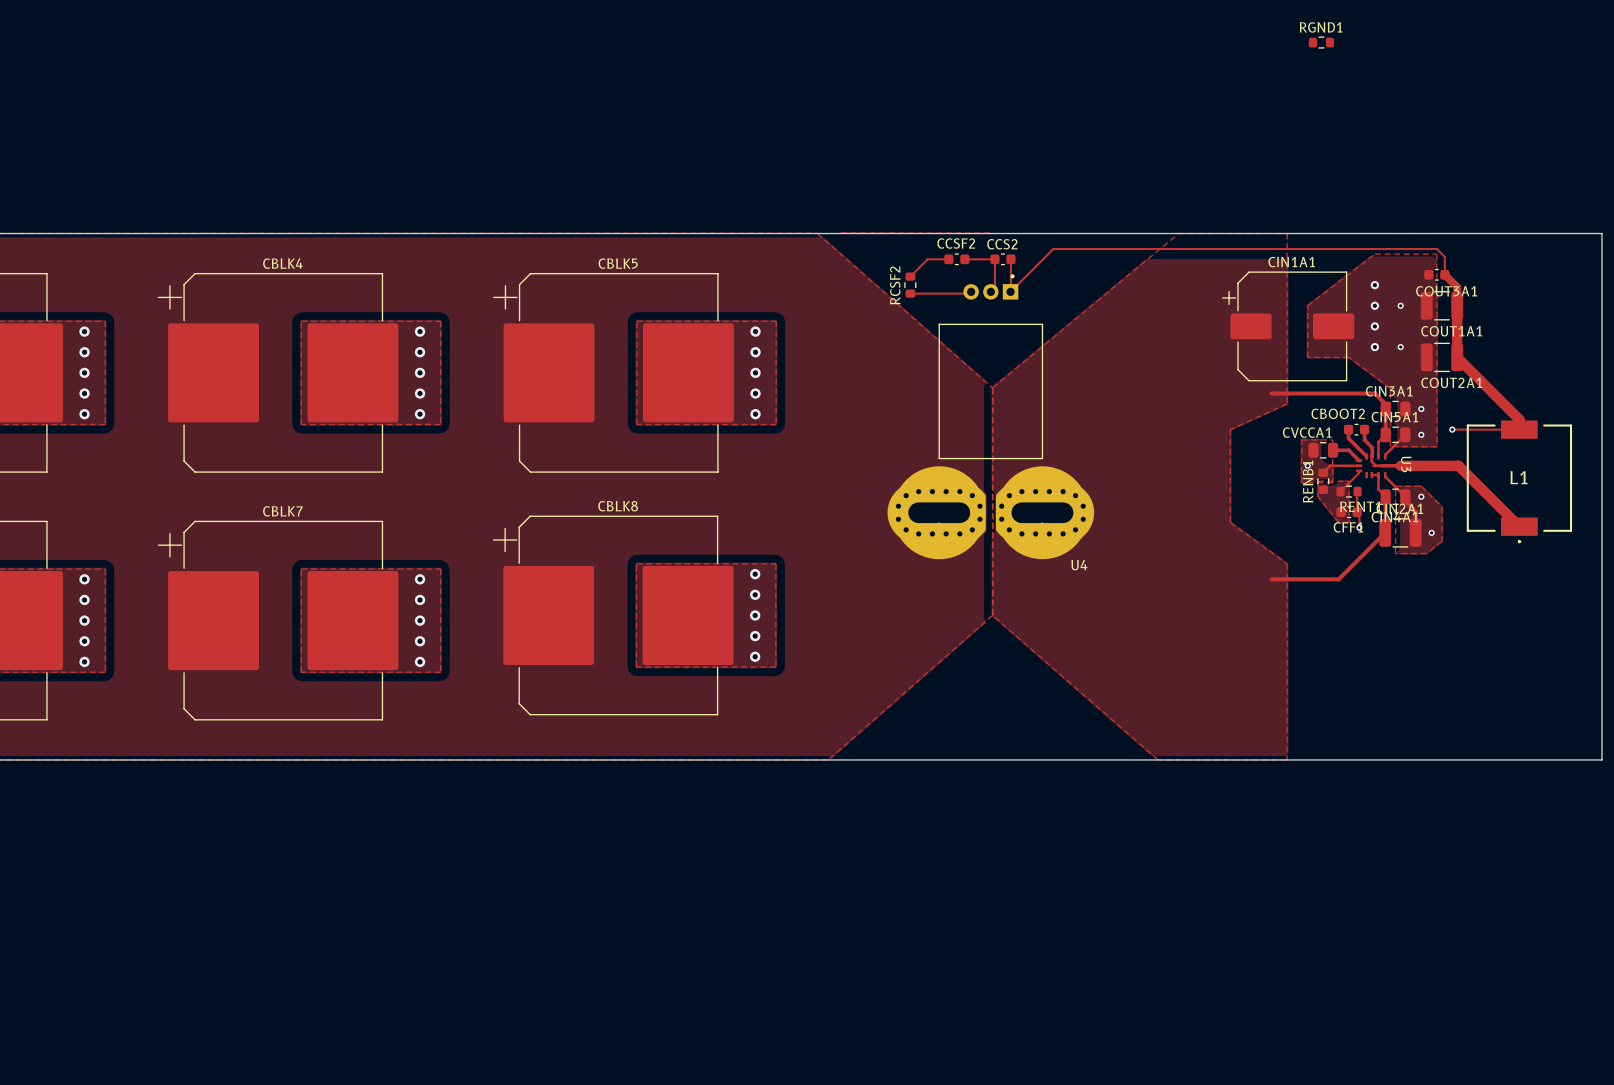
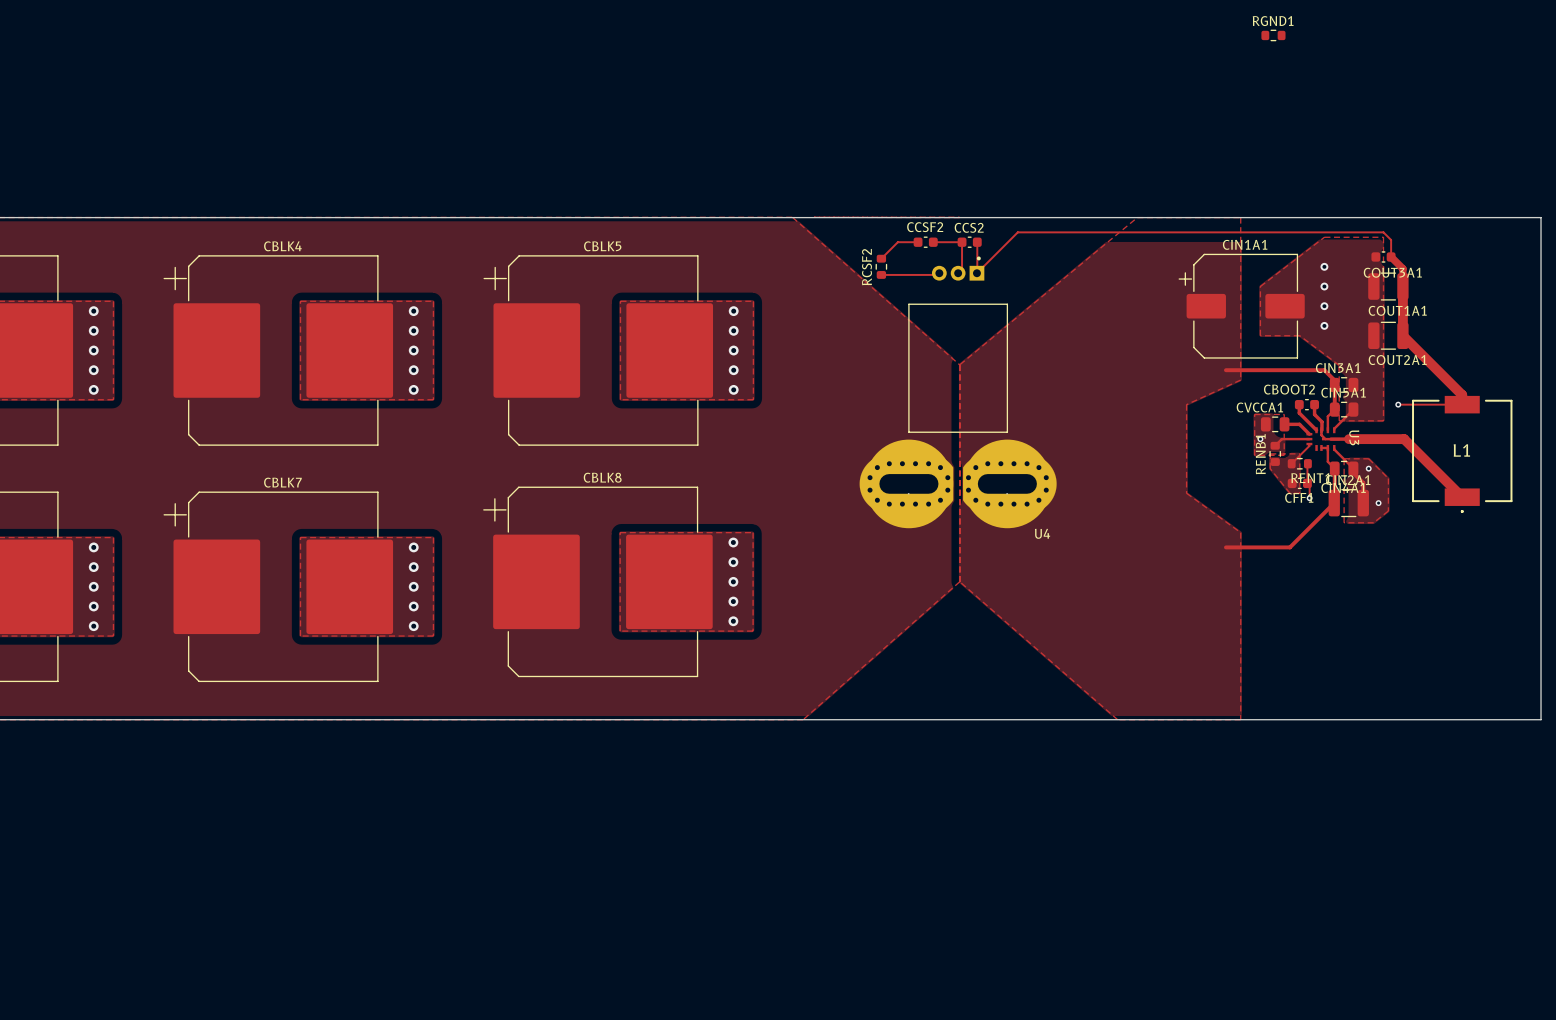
via: (1400, 305) -> none
via: (1400, 347) -> none
via: (1421, 409) -> none
via: (1421, 434) -> none

